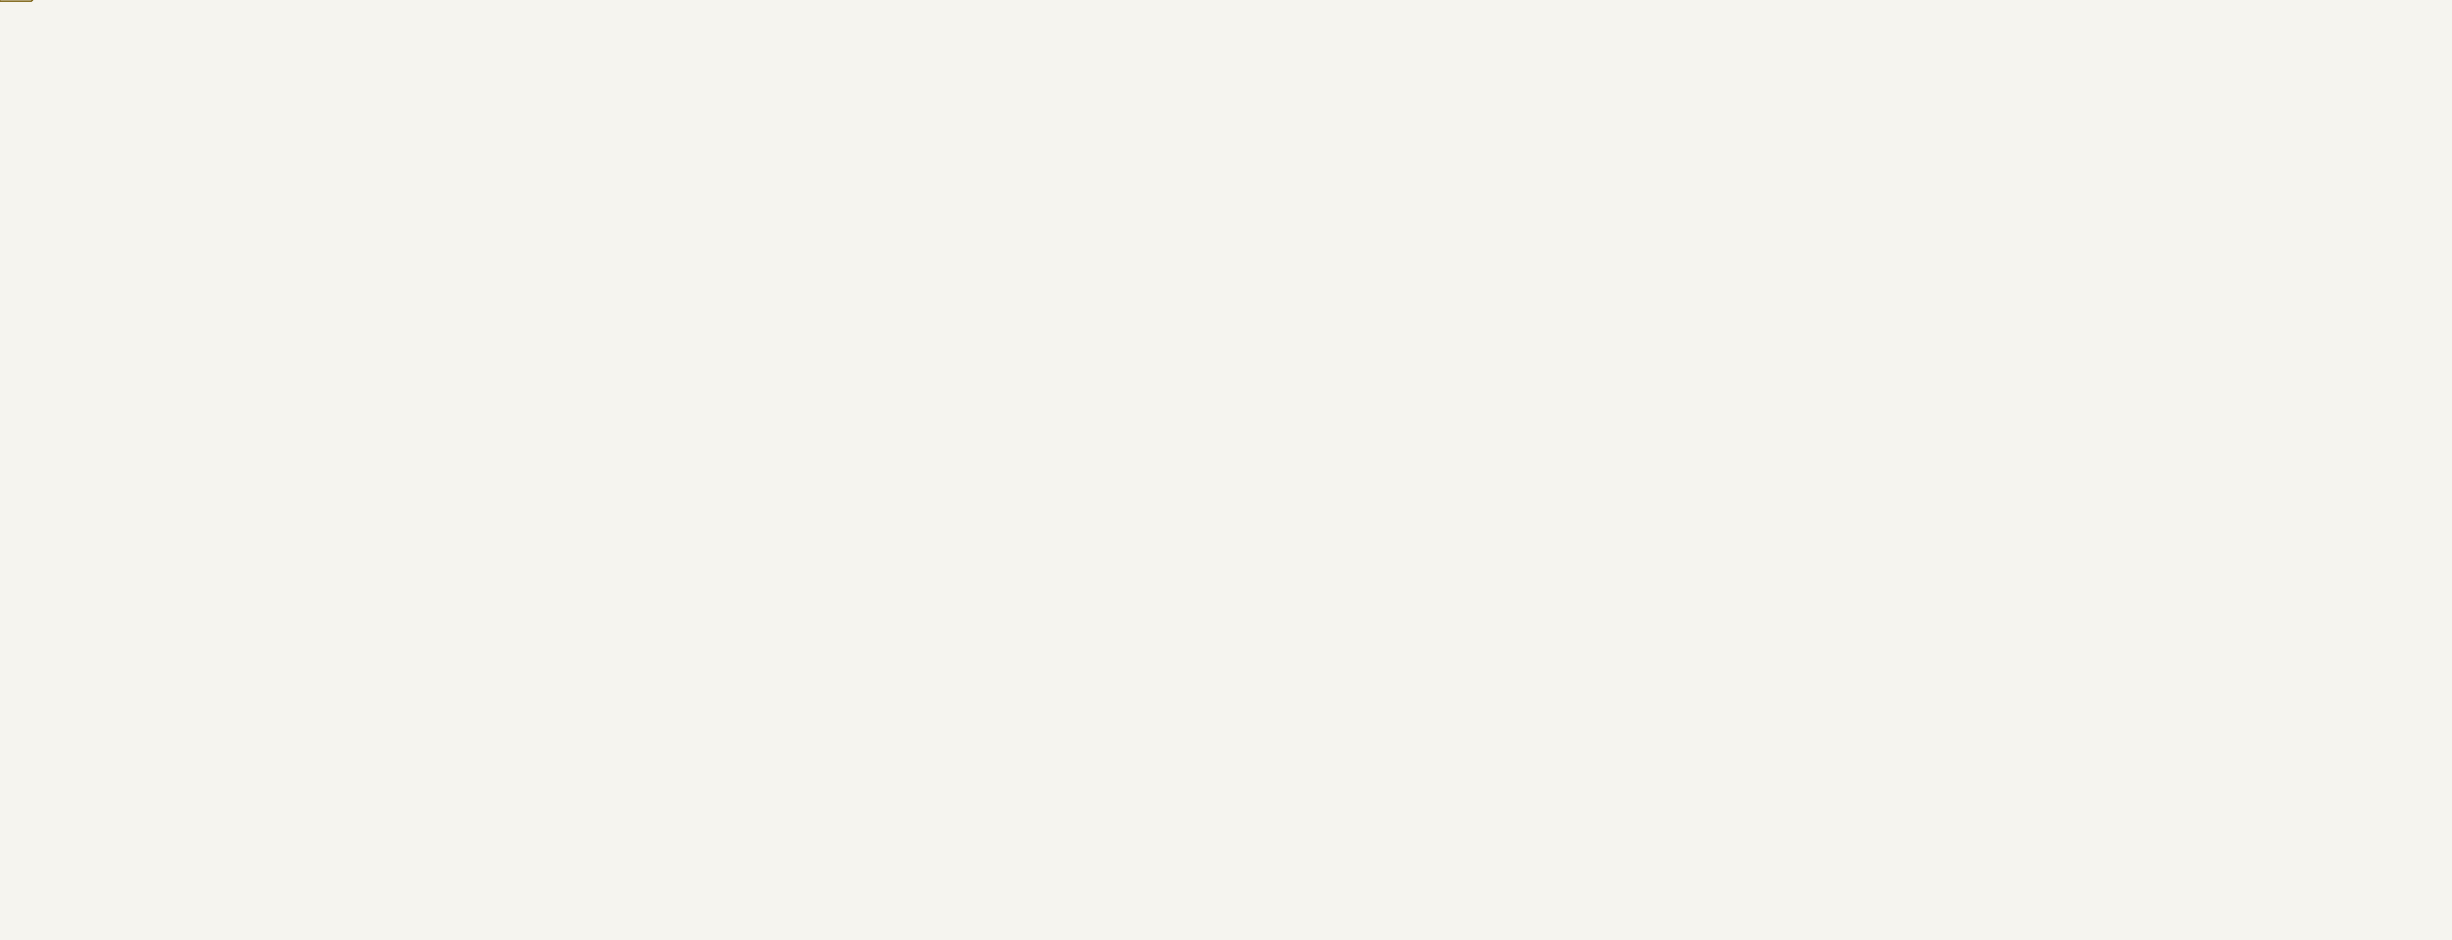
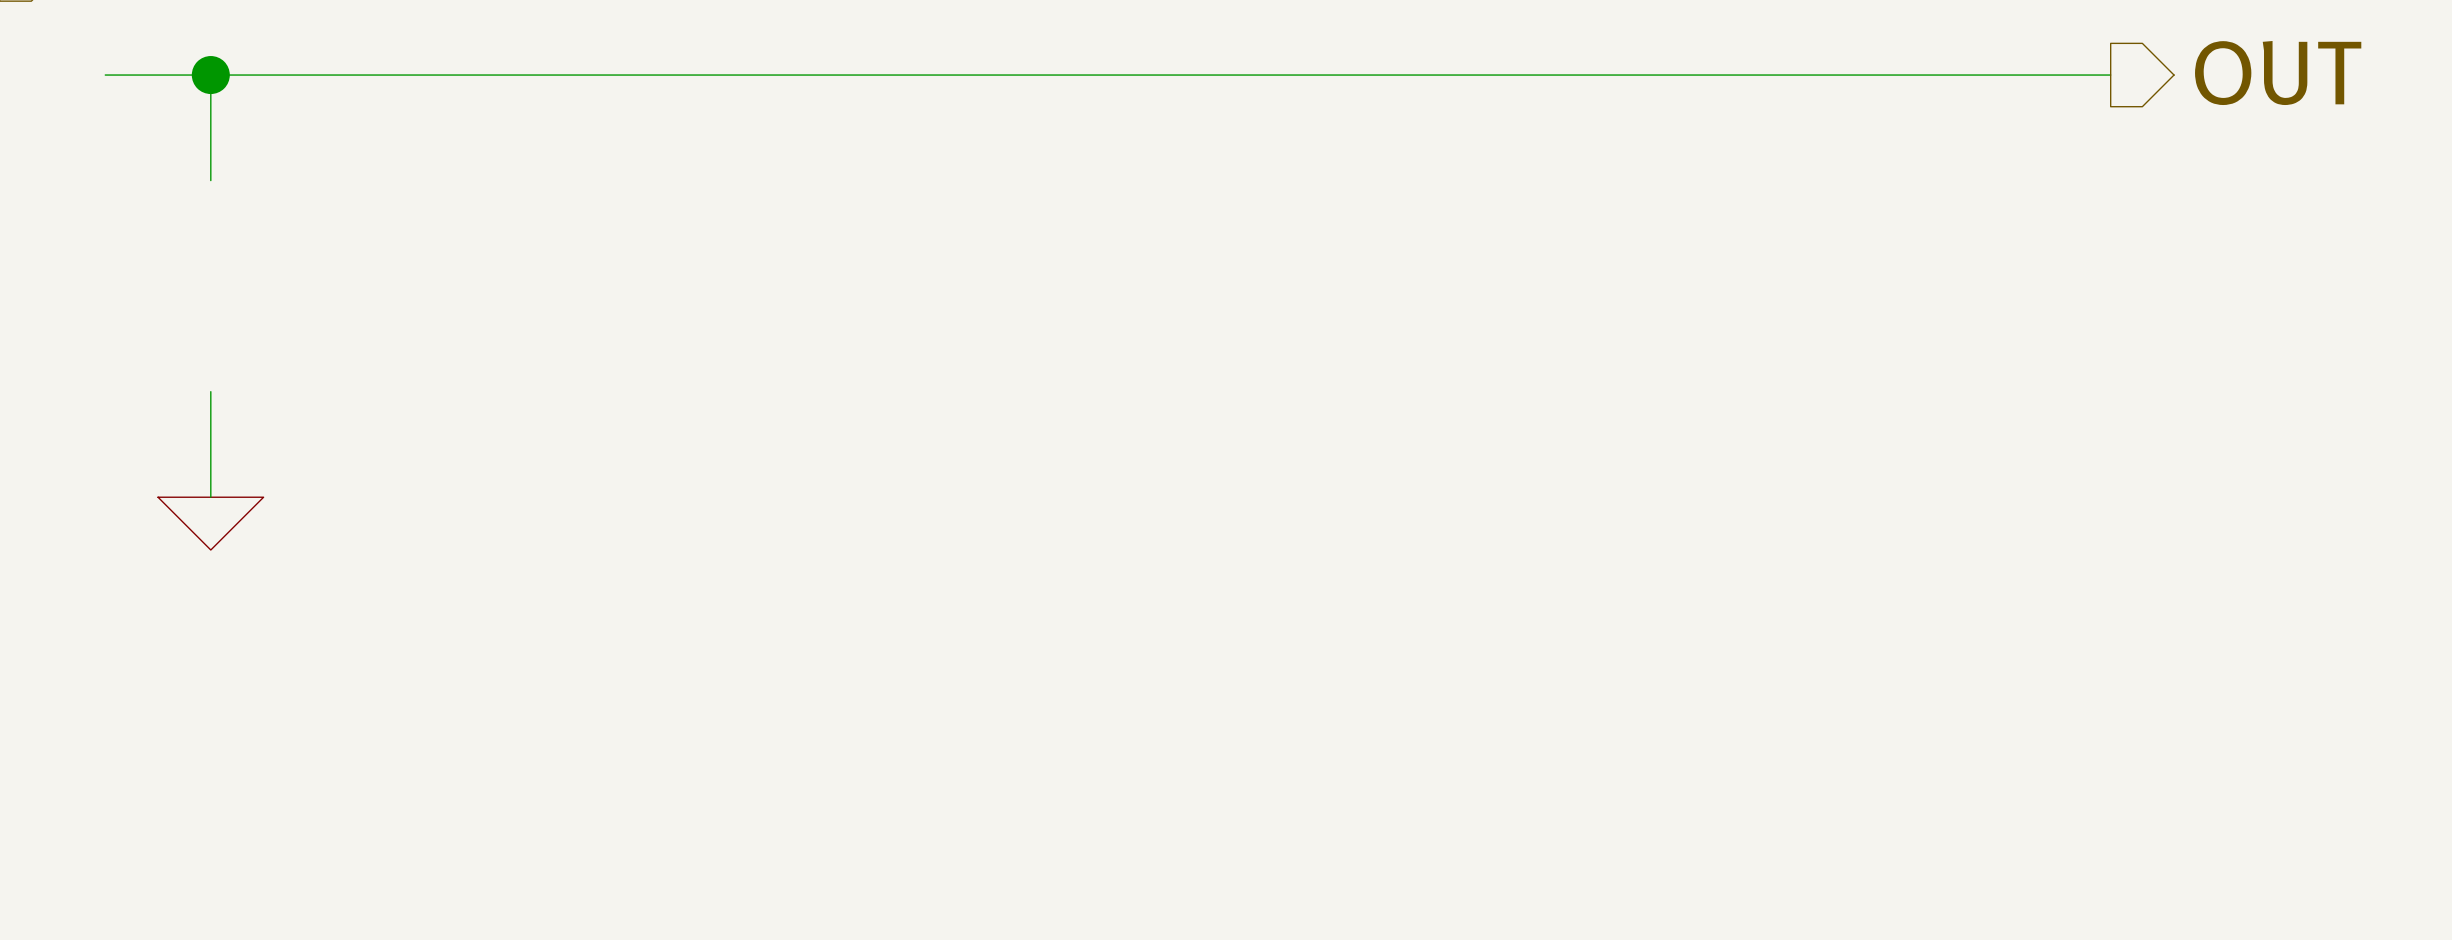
hierarchical label: none -> OUT (2278, 73)
wire: none -> (105, 75) (2110, 75)
wire: none -> (210, 75) (210, 180)
junction: none -> (210, 75)
wire: none -> (210, 391) (210, 497)
power symbol: none -> (210, 523)

